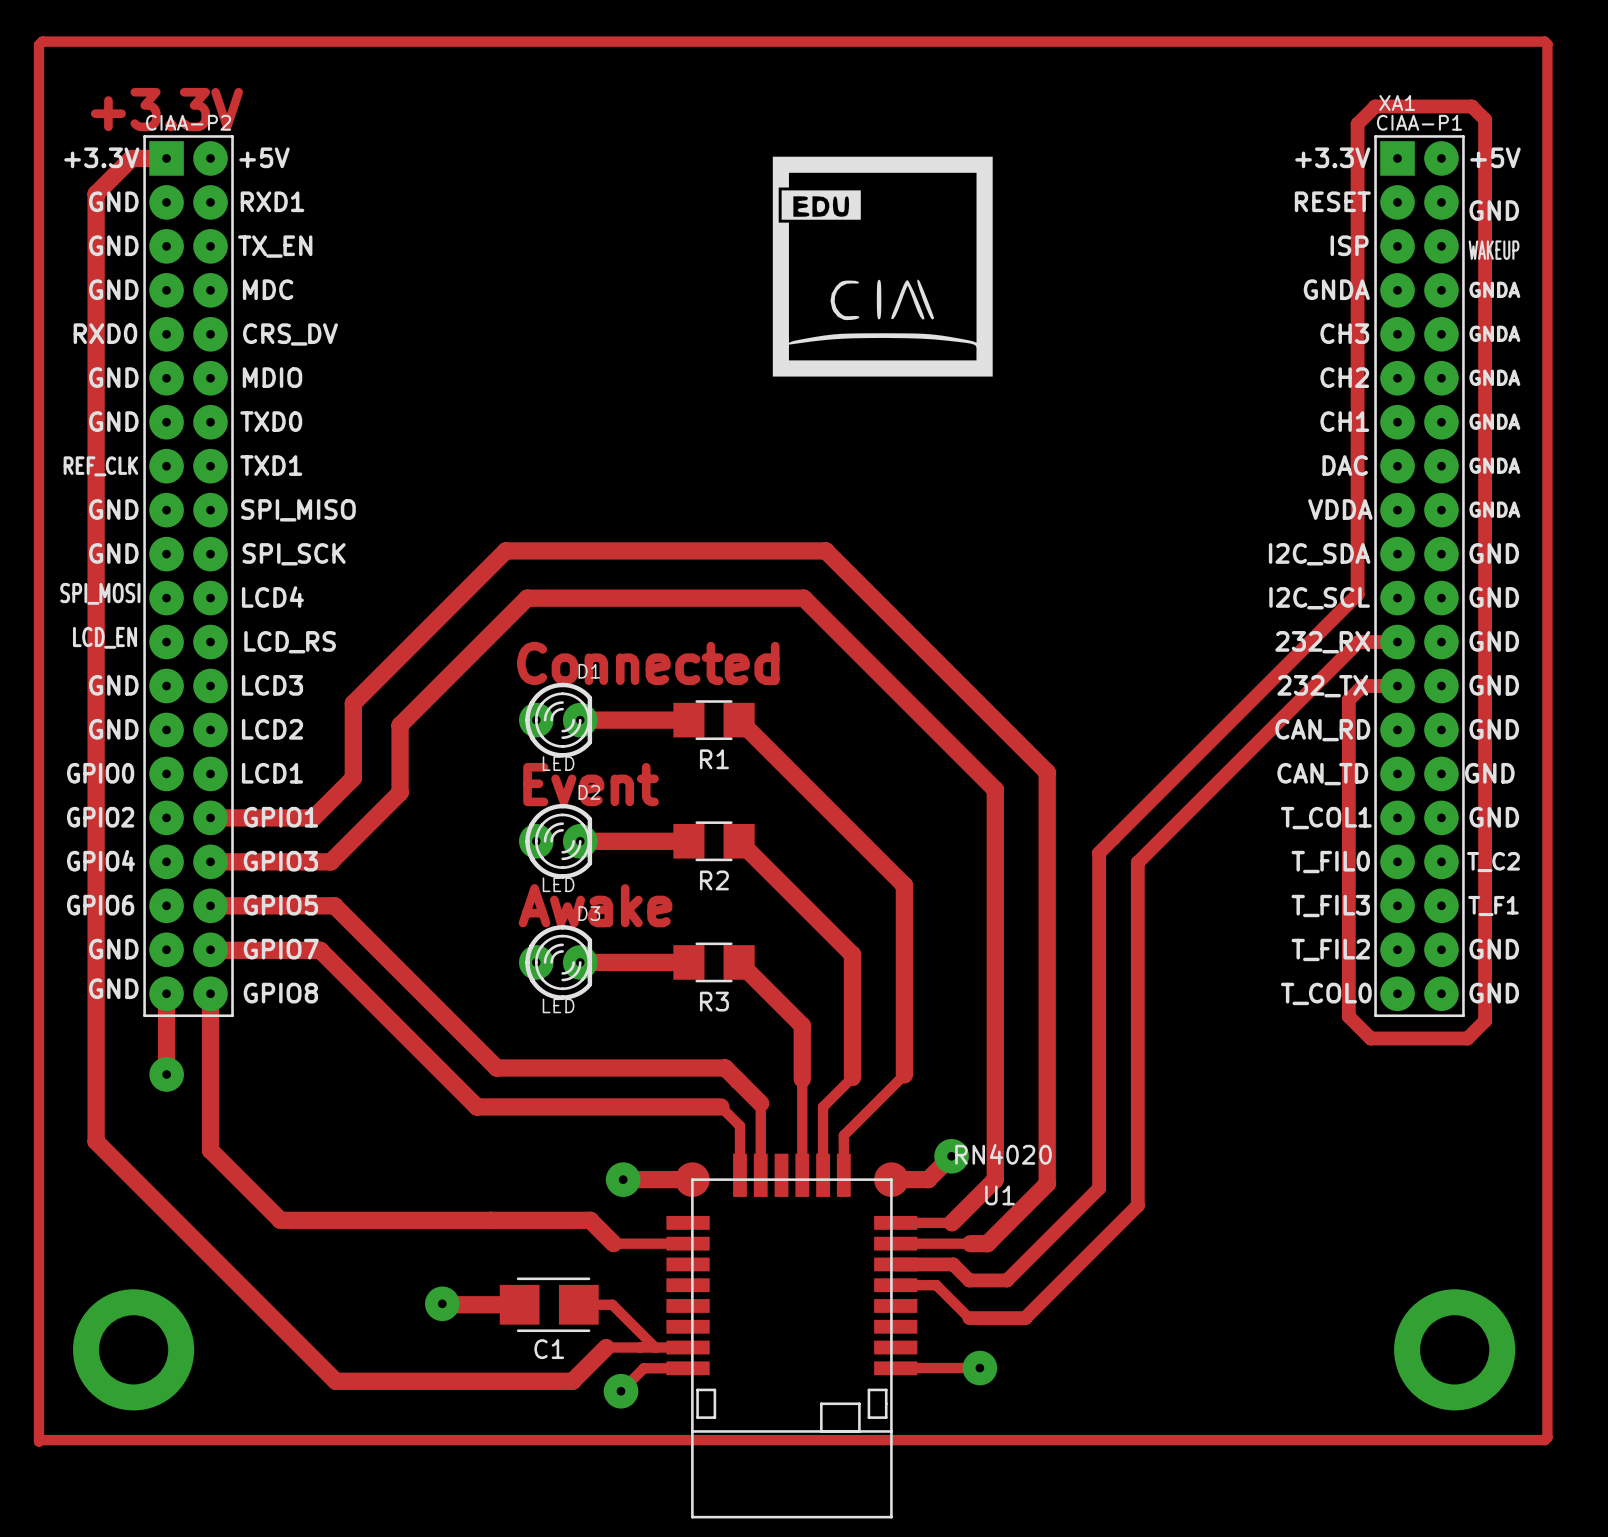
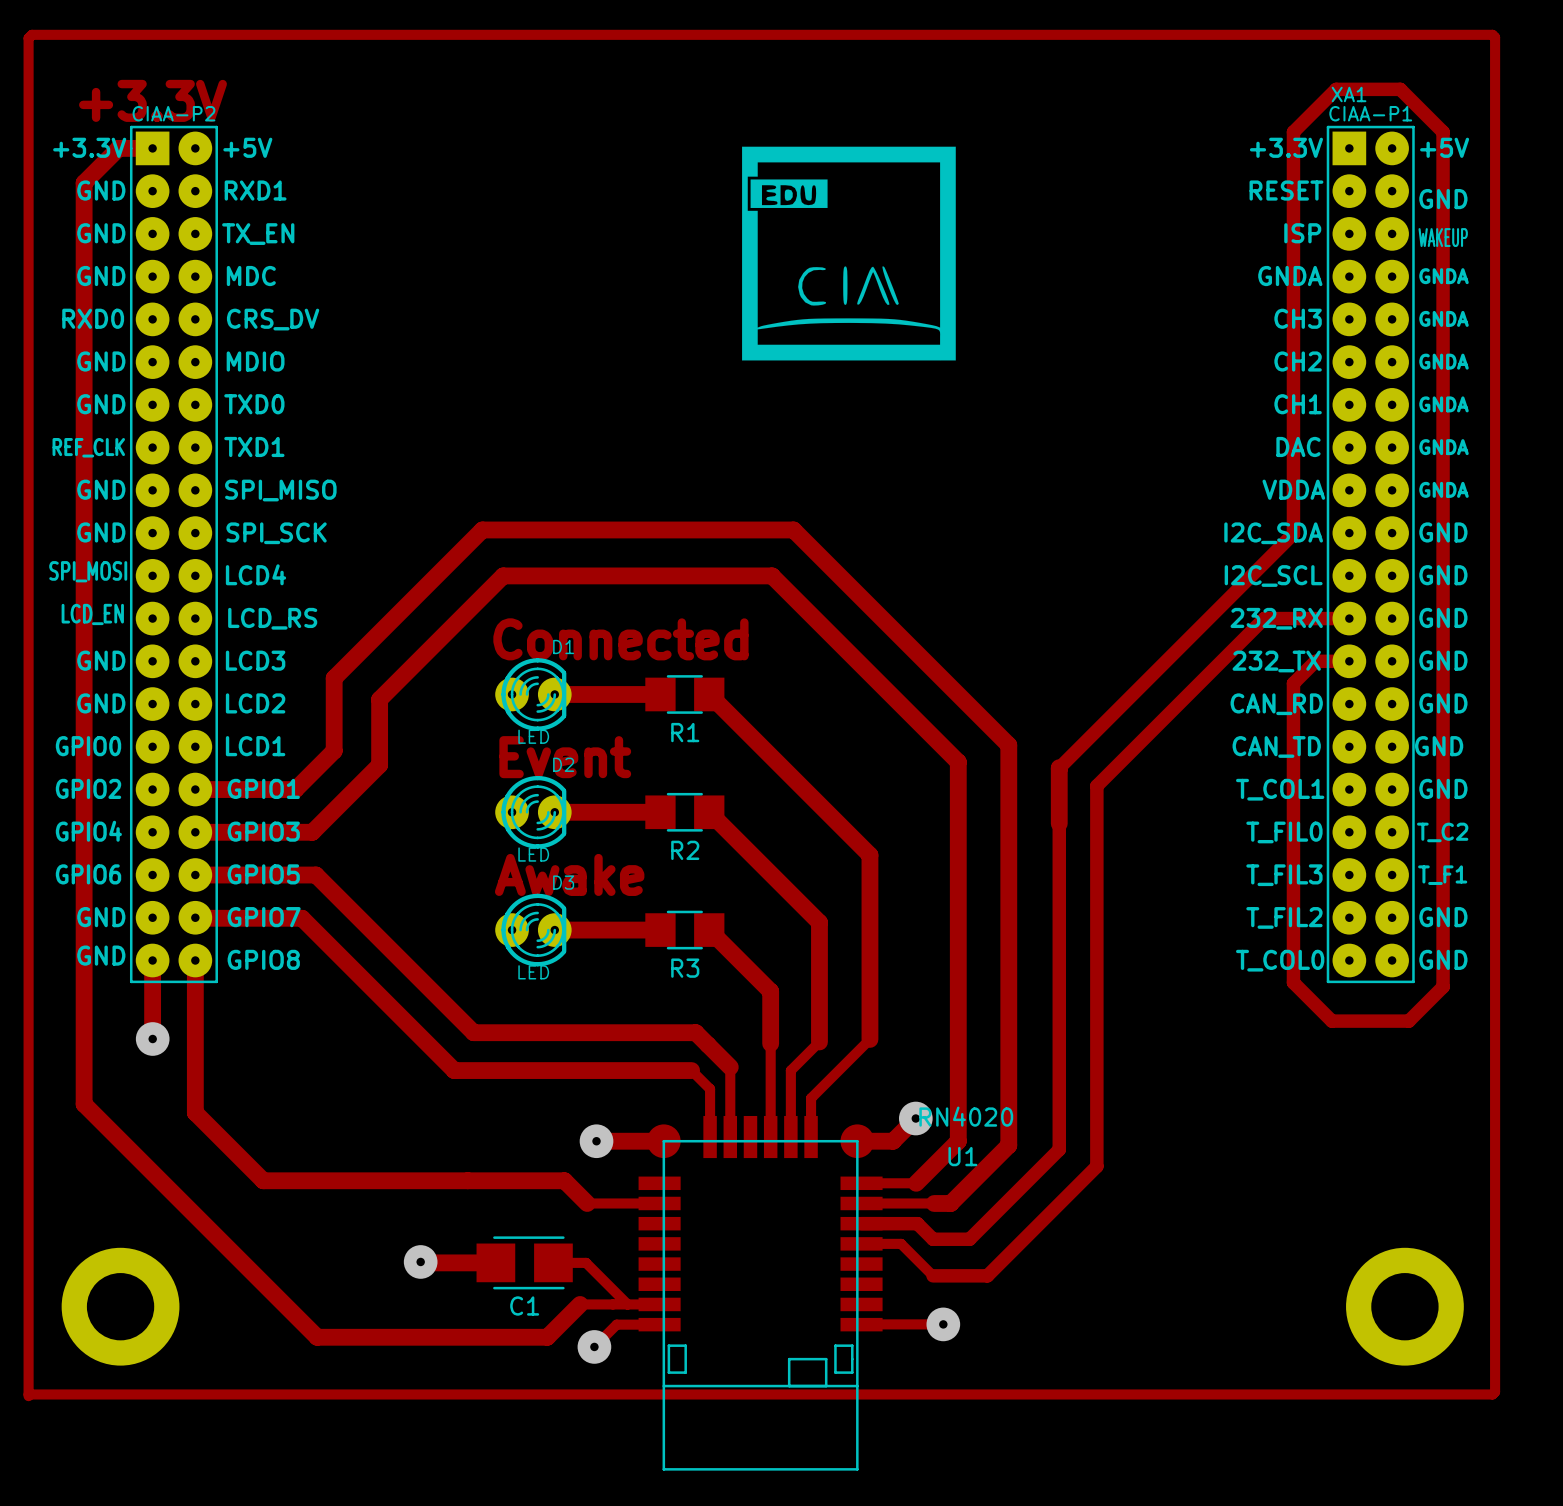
top track: (1375, 106) (1471, 106) (1485, 119) (1485, 1020) (1467, 1038) (1370, 1038) (1348, 1016) (1348, 699) -> (1327, 97) (1336, 89) (1400, 89) (1443, 132) (1443, 986) (1408, 1021) (1331, 1021) (1293, 982) (1293, 683) (1302, 674)
top track: (1357, 124) (1357, 594) (1310, 642) -> (1310, 114) (1293, 132) (1293, 533) (1059, 768)
top track: (1358, 642) (1137, 862) -> (1311, 618) (1264, 618)
top track: none -> (1059, 767) (1059, 823)
top track: (1137, 814) (1099, 852) -> (1096, 786) (1096, 833)

